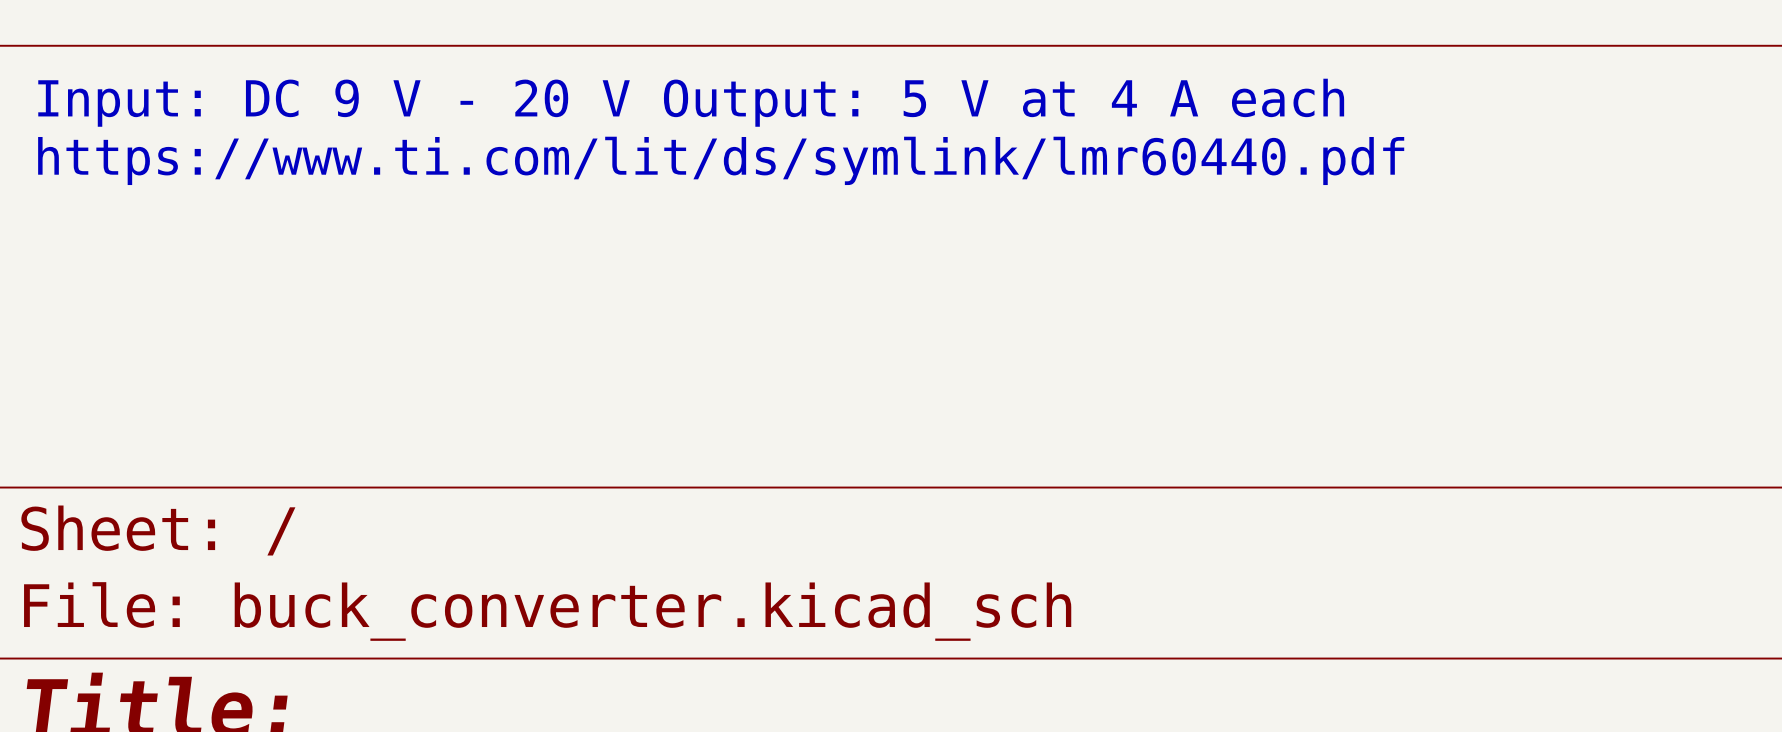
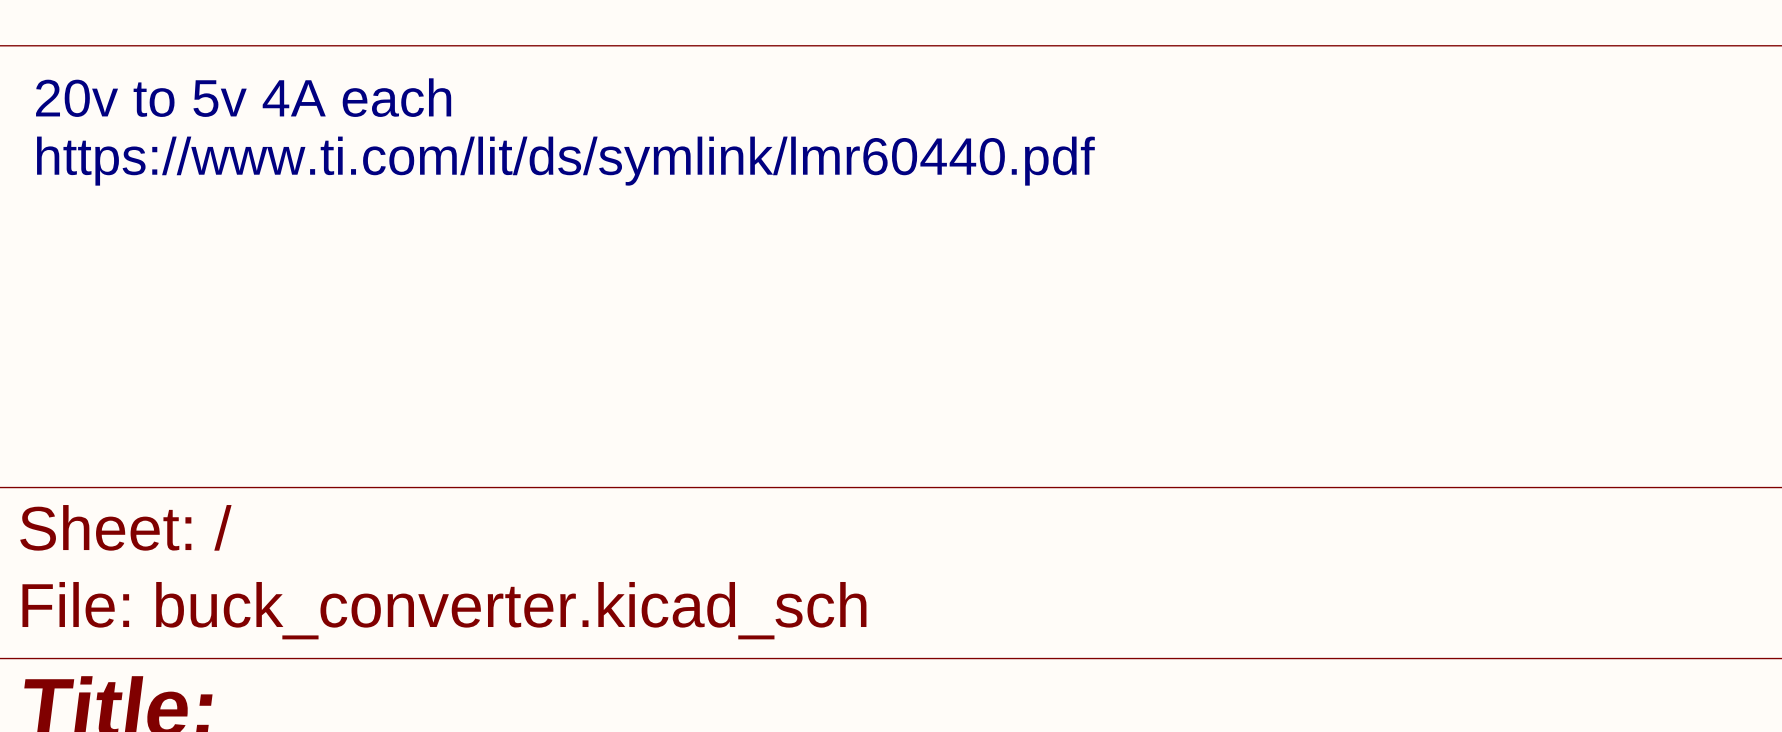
text: Input: DC 9 V - 20 V Output: 5 V at 4 A each (691, 102) -> 20v to 5v 4A each (243, 97)

